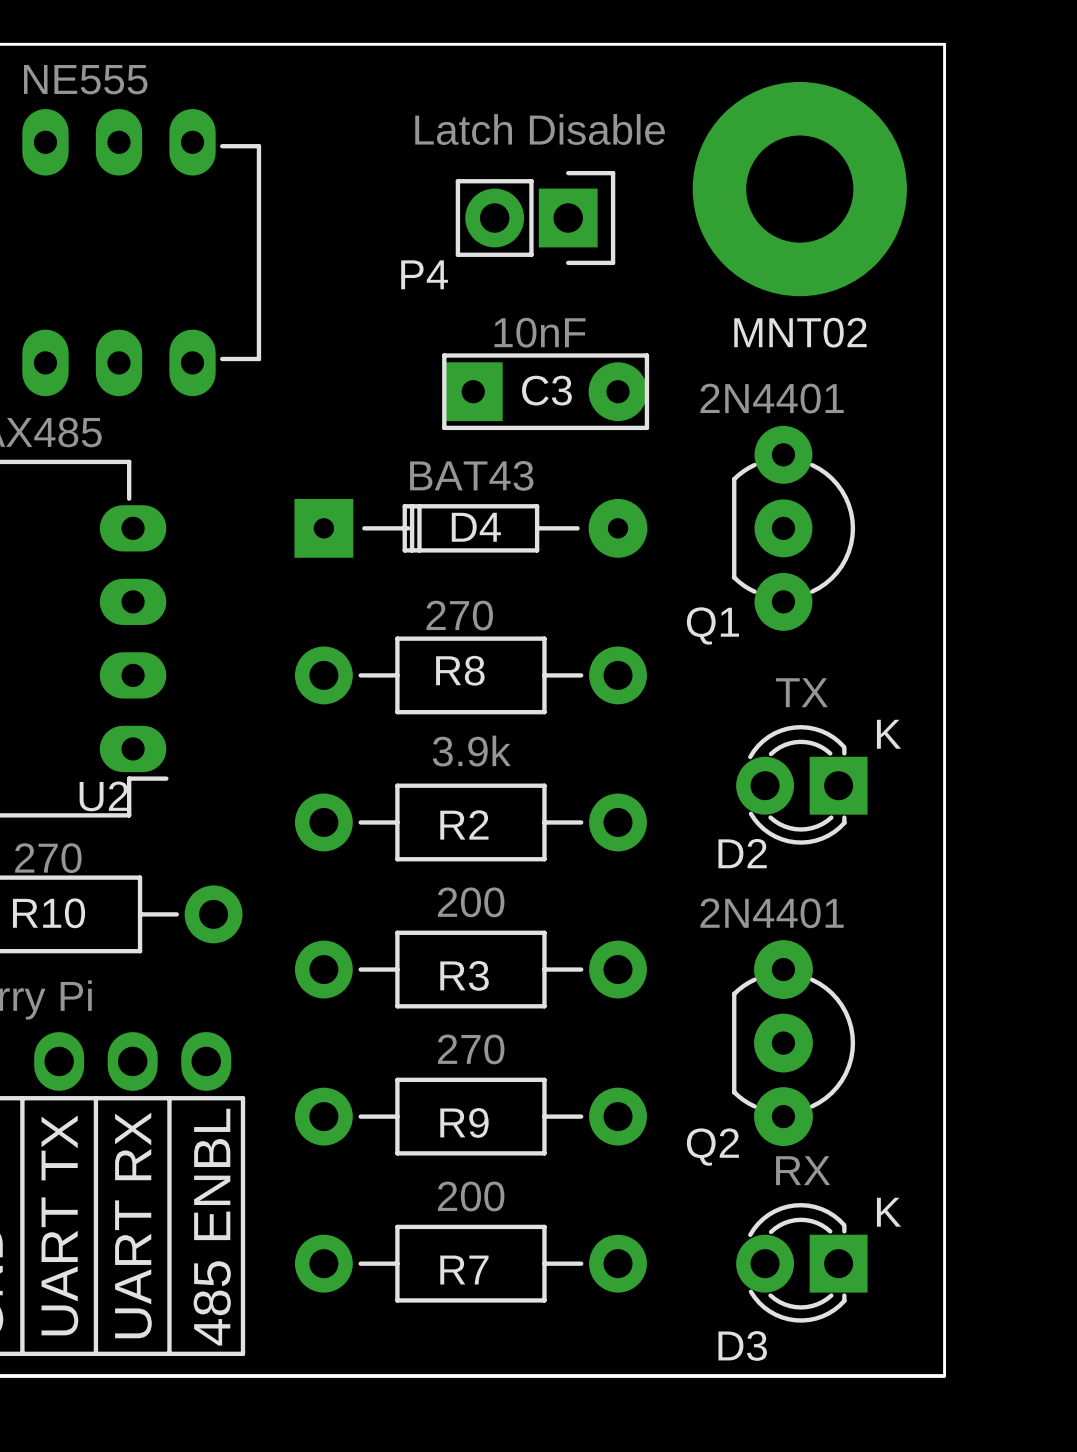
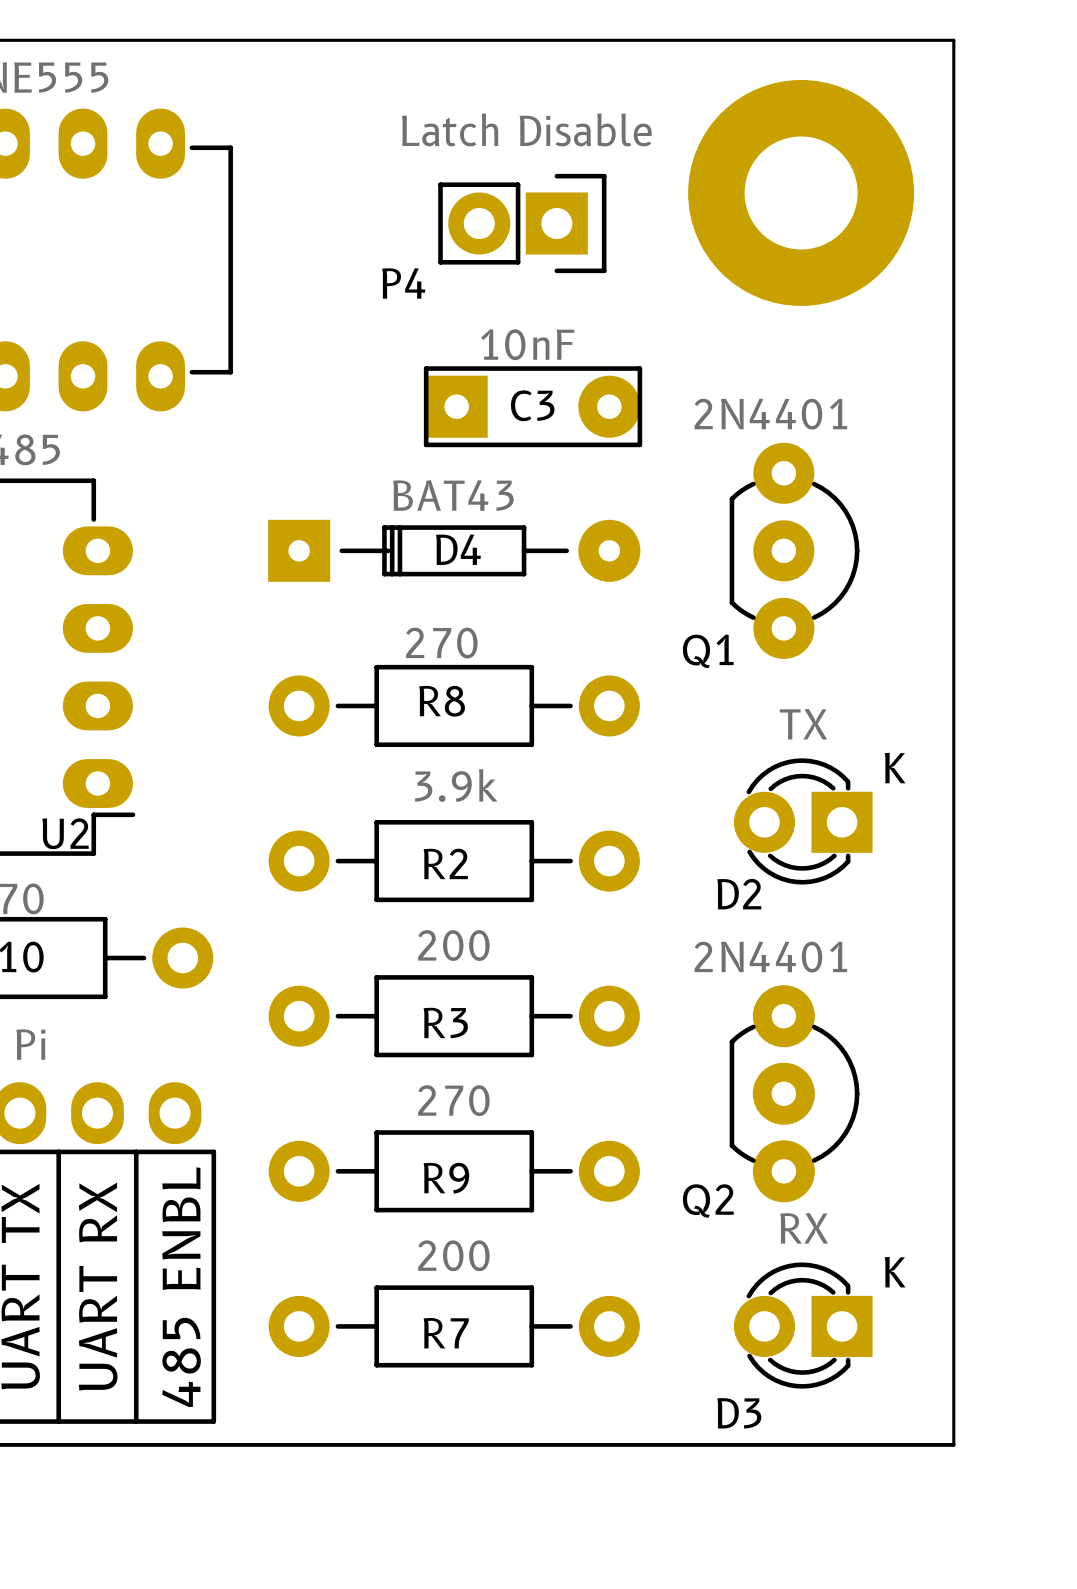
MNT02 name: MNT02 (800, 332) -> none

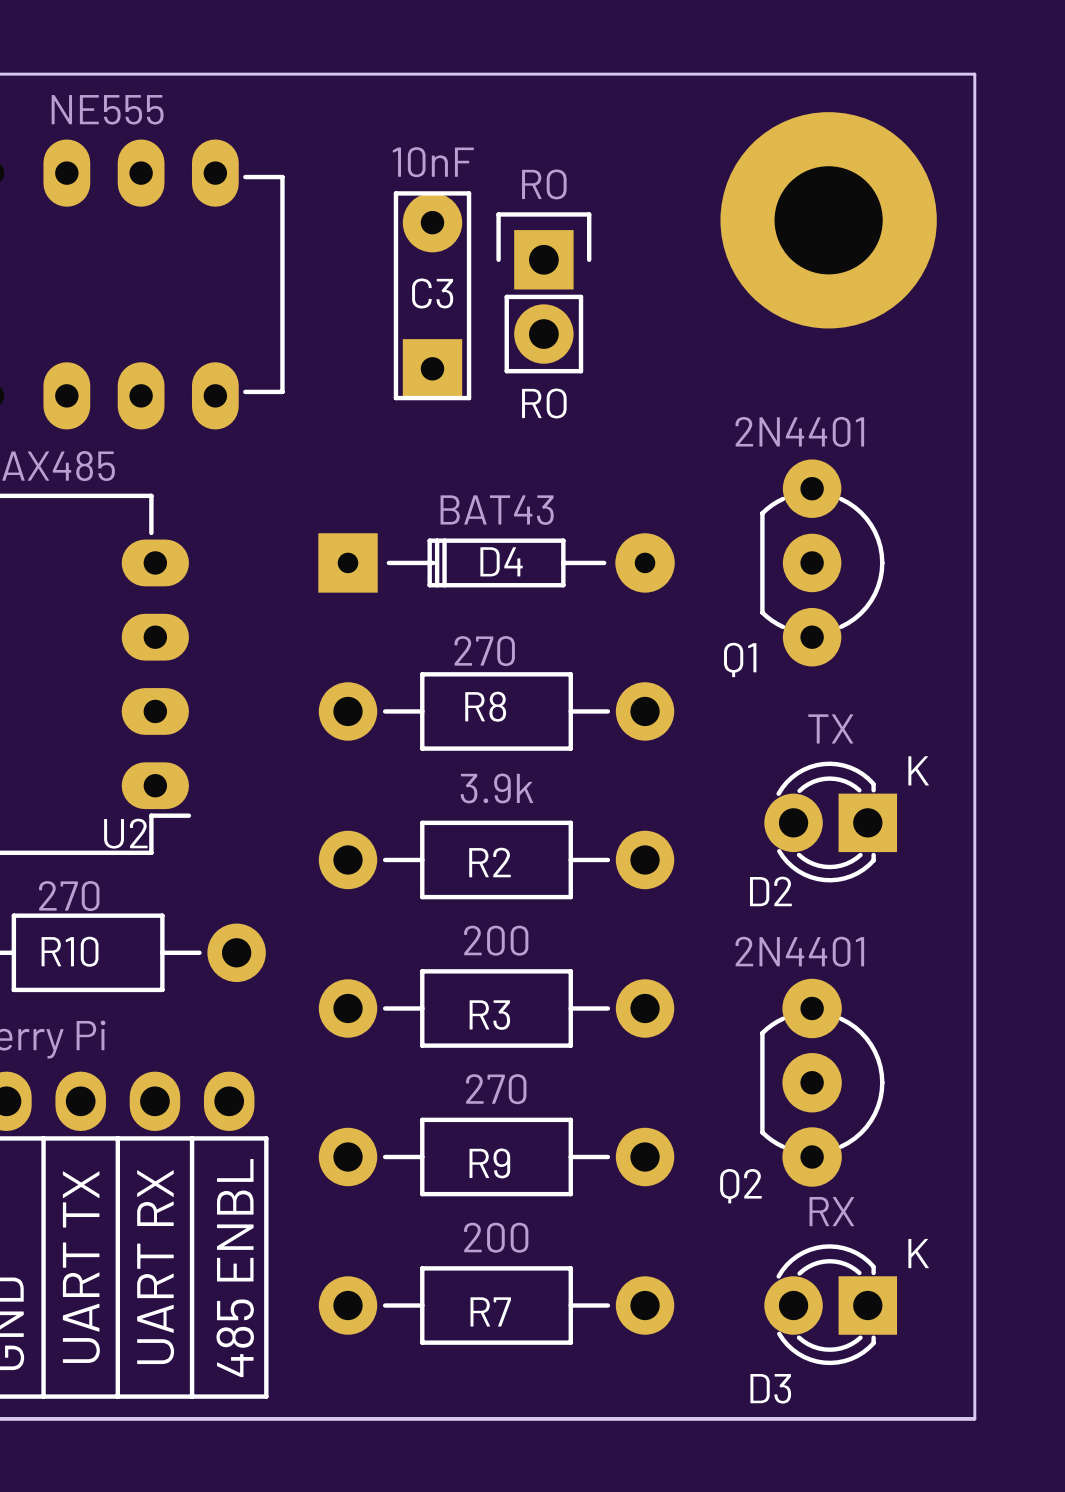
P4: Latch Disable (522, 223) -> none
RO: none -> RO (543, 292)
C3 value position: 10nF (527, 344) -> 10nF (433, 162)
C3 rotation: 0° (533, 406) -> 90° counterclockwise (432, 295)
C3 position: (533, 406) -> (432, 295)

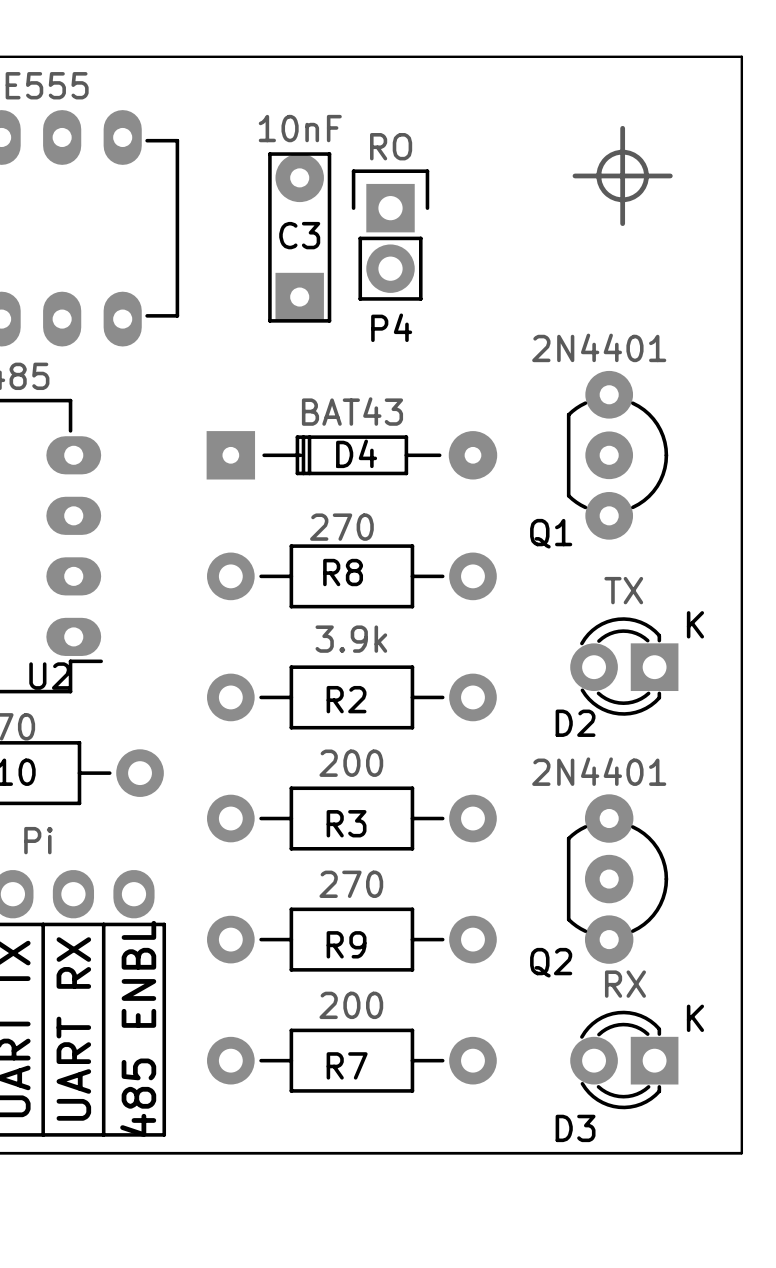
line: none -> (622, 128) (622, 223)
drawing: none -> [596, 149, 649, 203]
line: none -> (574, 175) (670, 175)
part: (828, 220) -> none
RO name: RO (544, 403) -> P4 (391, 327)

